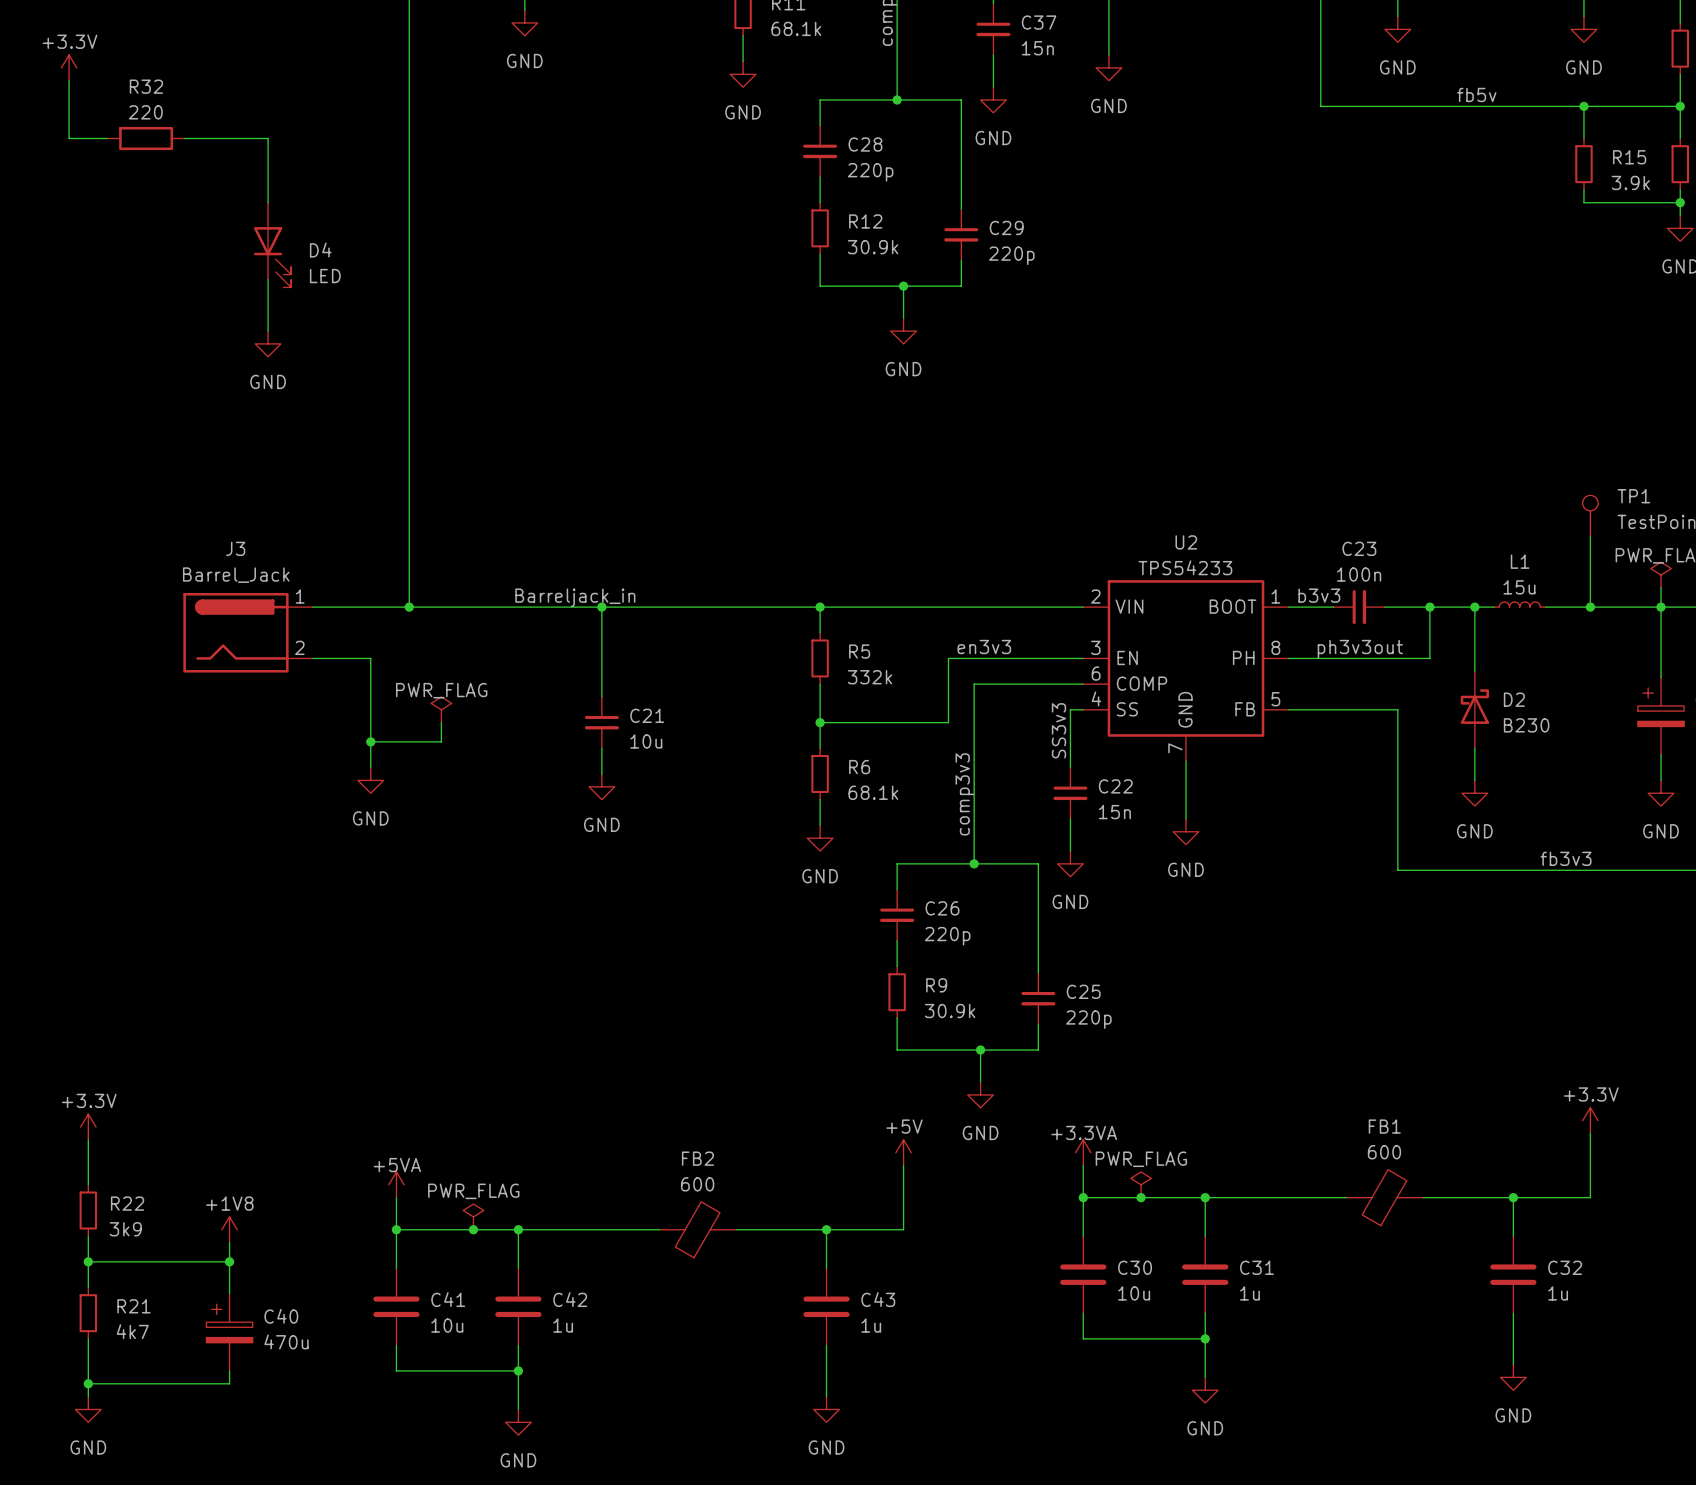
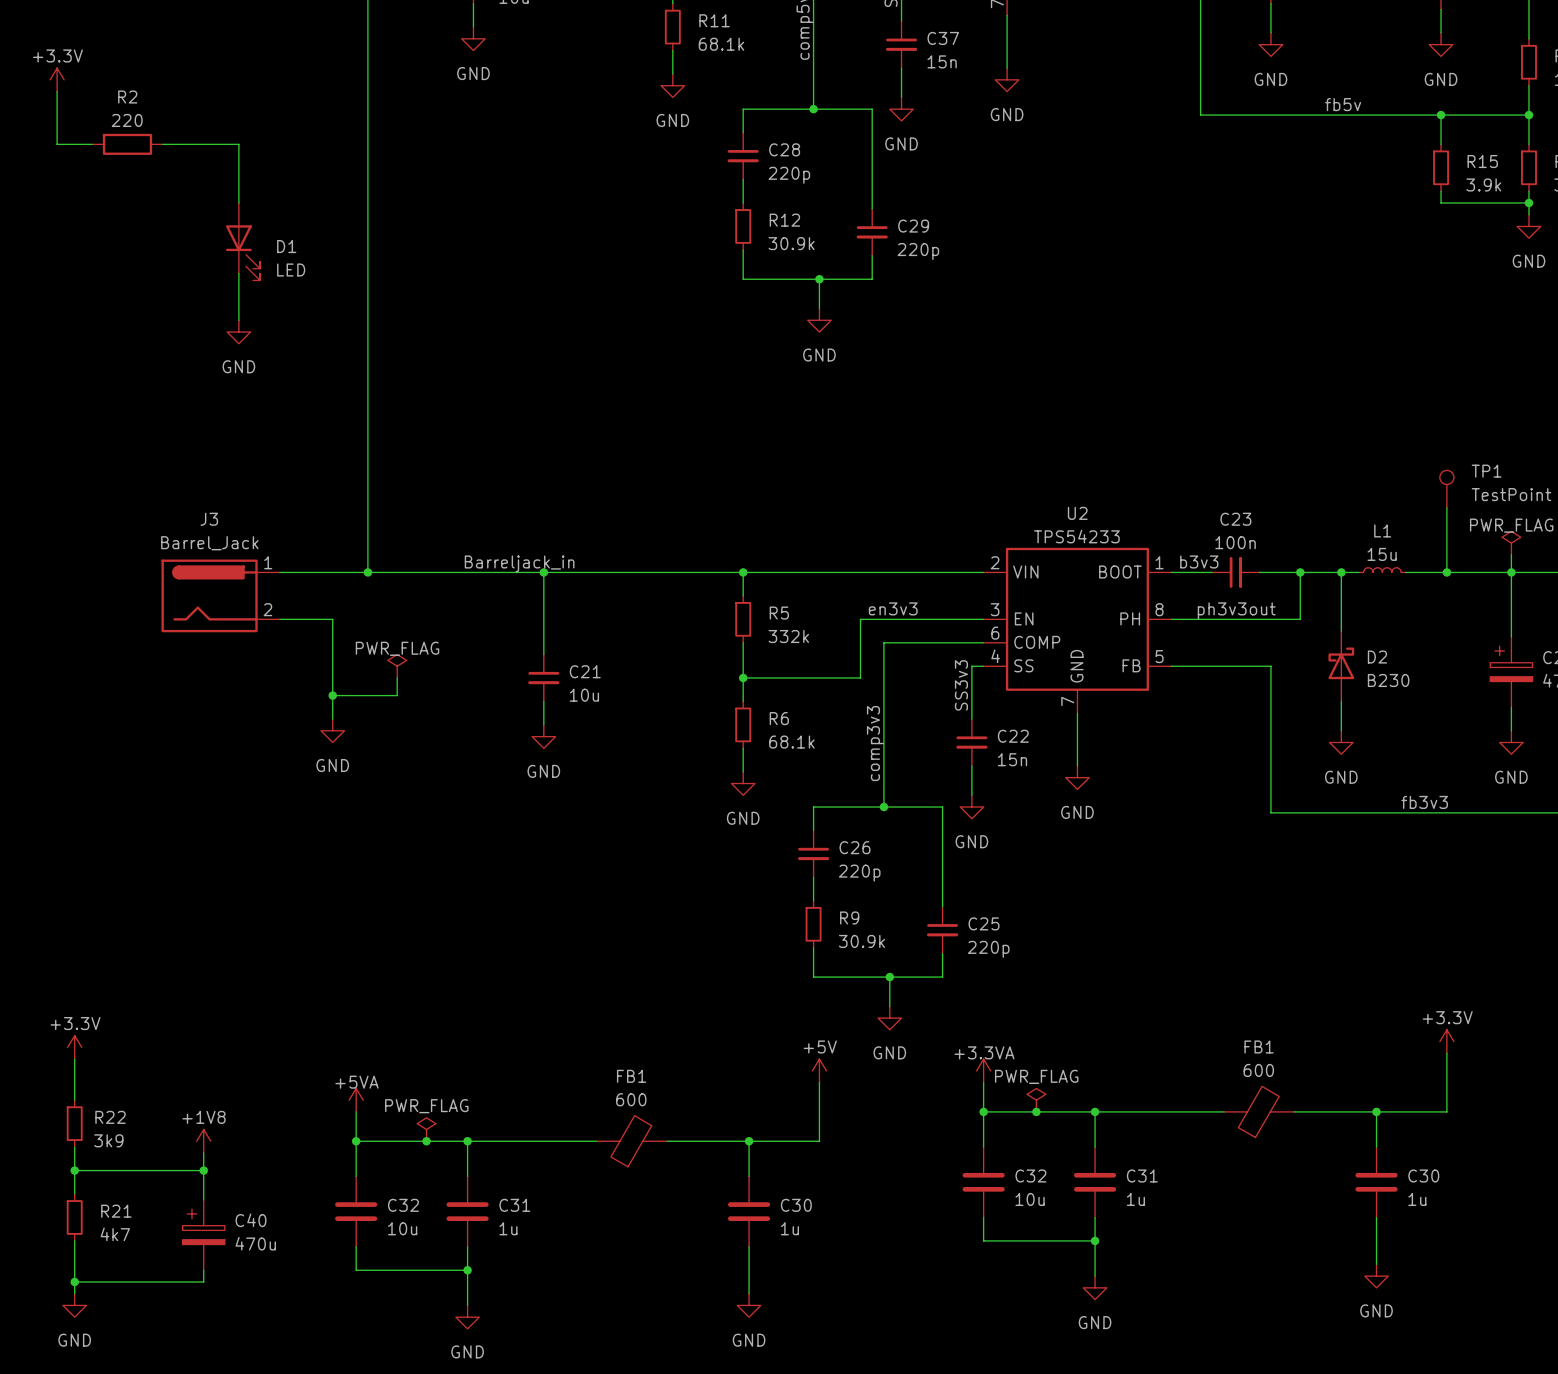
R32 name: R32 (146, 86) -> R2 (127, 97)
D4 name: D4 (320, 250) -> D1 (286, 246)
FB2 name: FB2 (697, 1158) -> FB1 (631, 1076)
C30 name: C30 (1135, 1267) -> C32 (1030, 1176)
C32 name: C32 (1565, 1267) -> C30 (1423, 1176)
C41 name: C41 (448, 1299) -> C32 (403, 1205)
C42 name: C42 (570, 1299) -> C31 (514, 1205)
C43 name: C43 (878, 1299) -> C30 (796, 1205)

